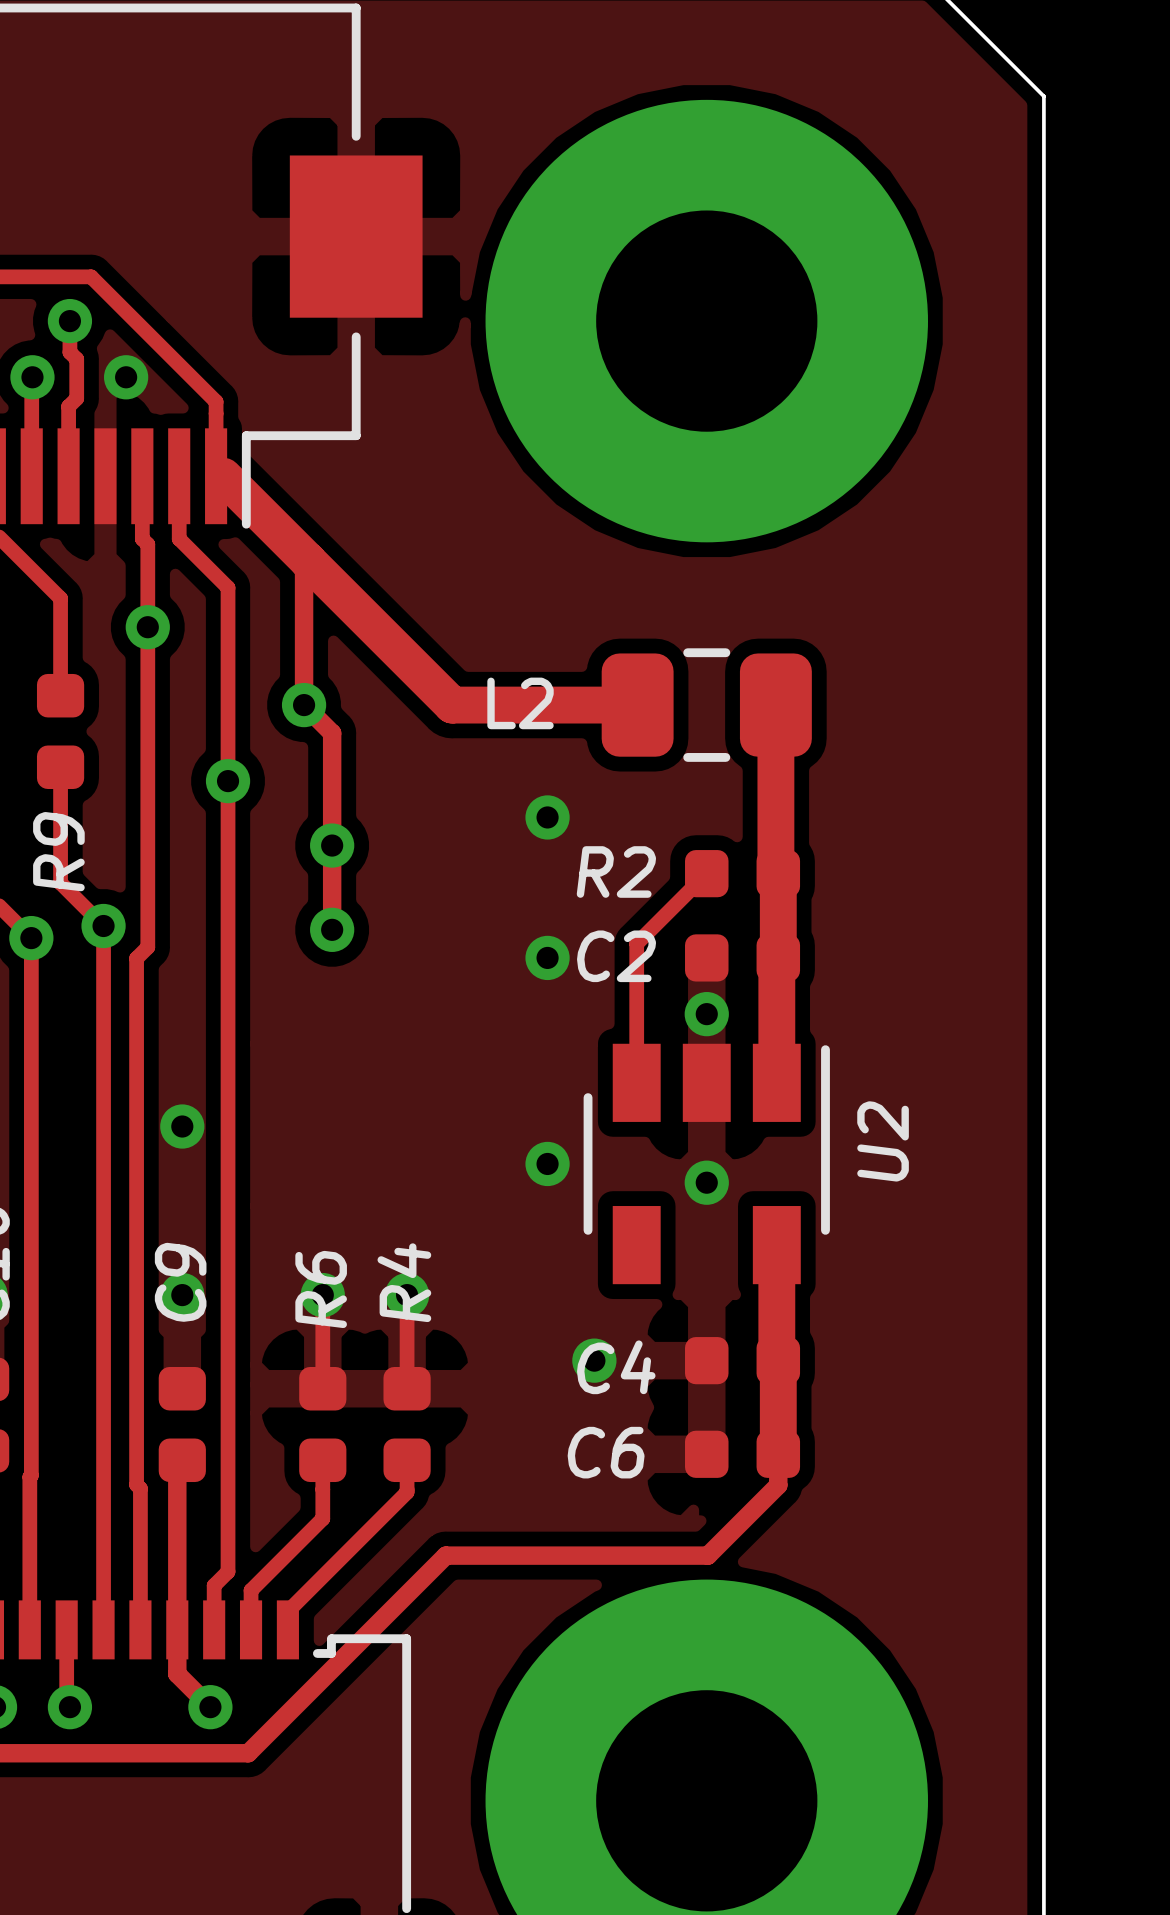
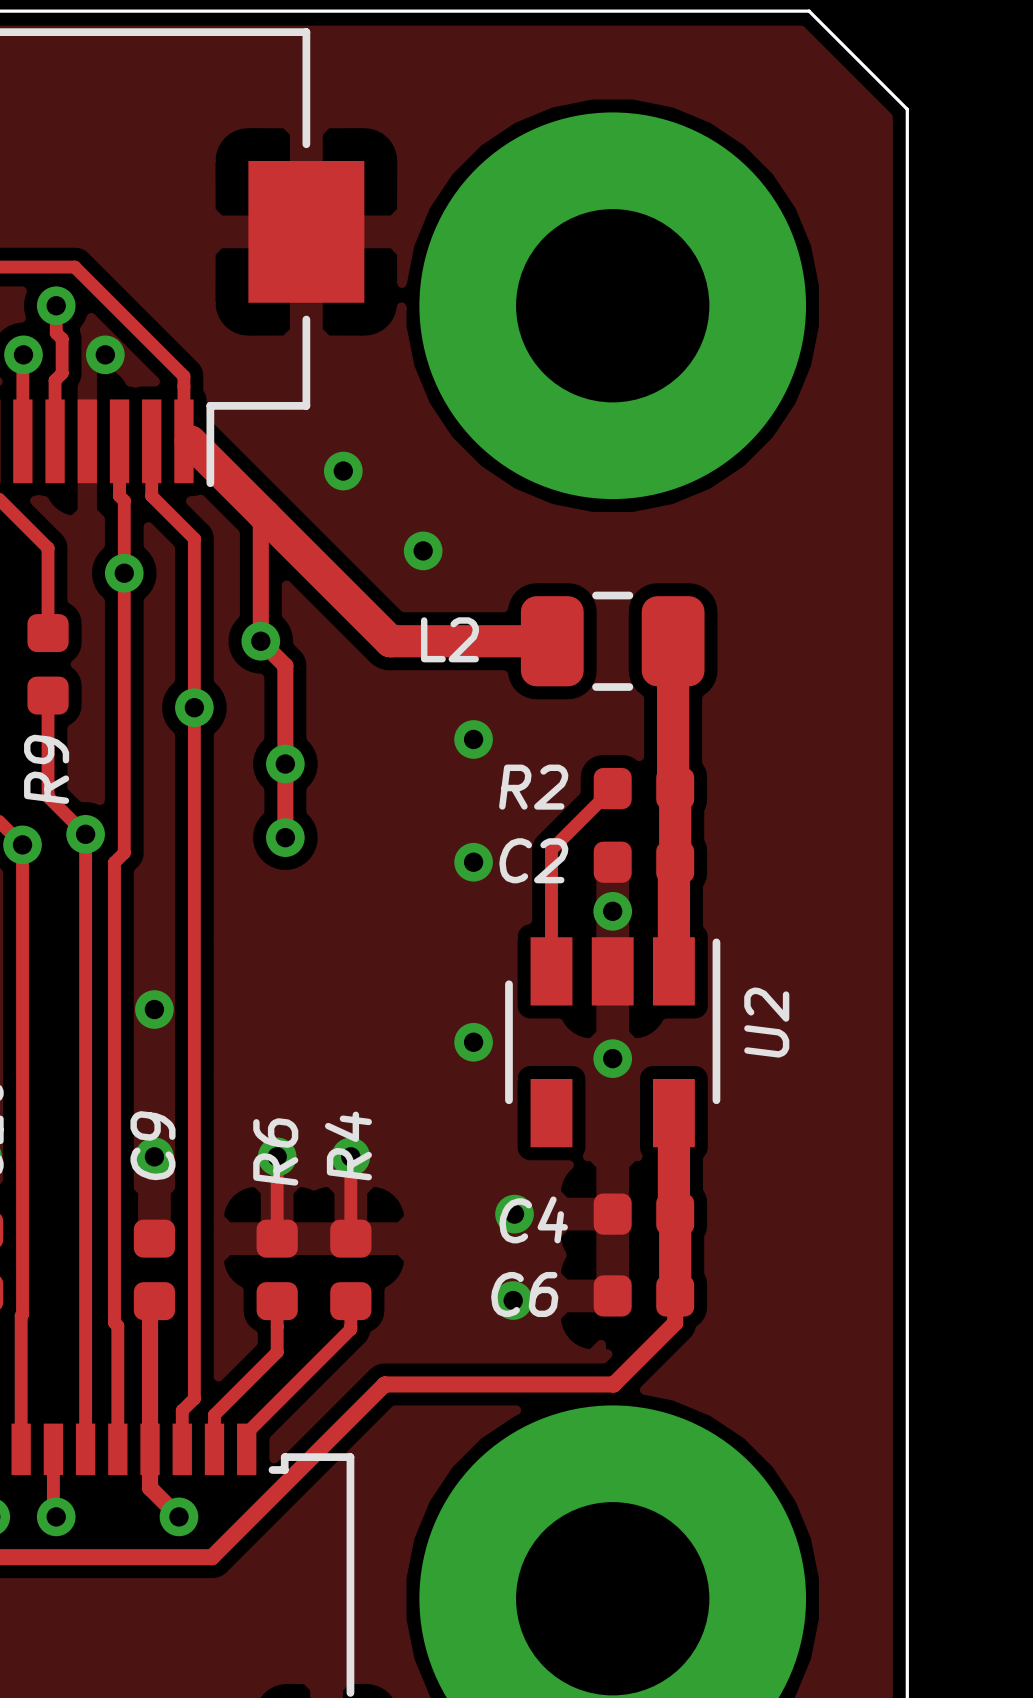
via: none -> (343, 471)
via: none -> (423, 550)
via: none -> (513, 1300)

